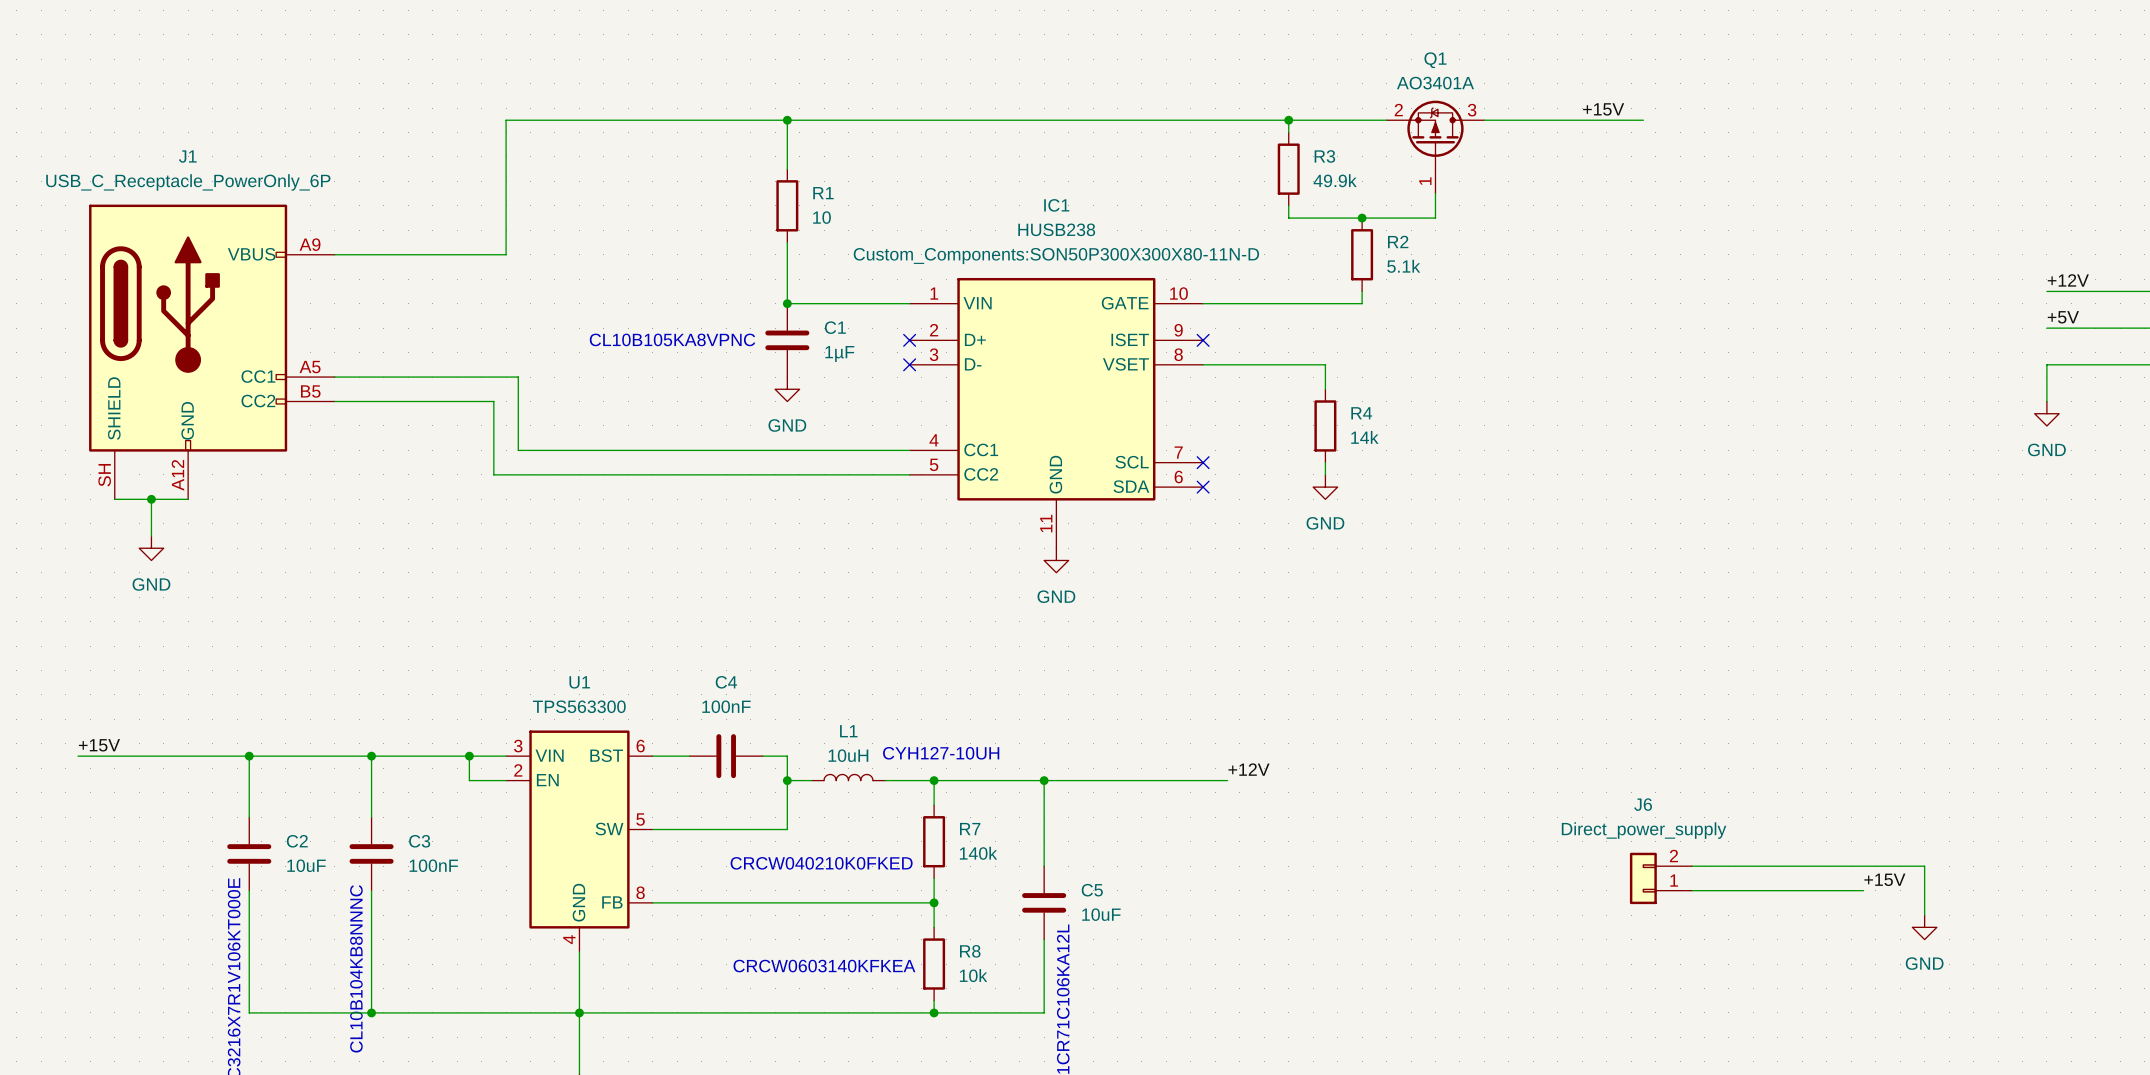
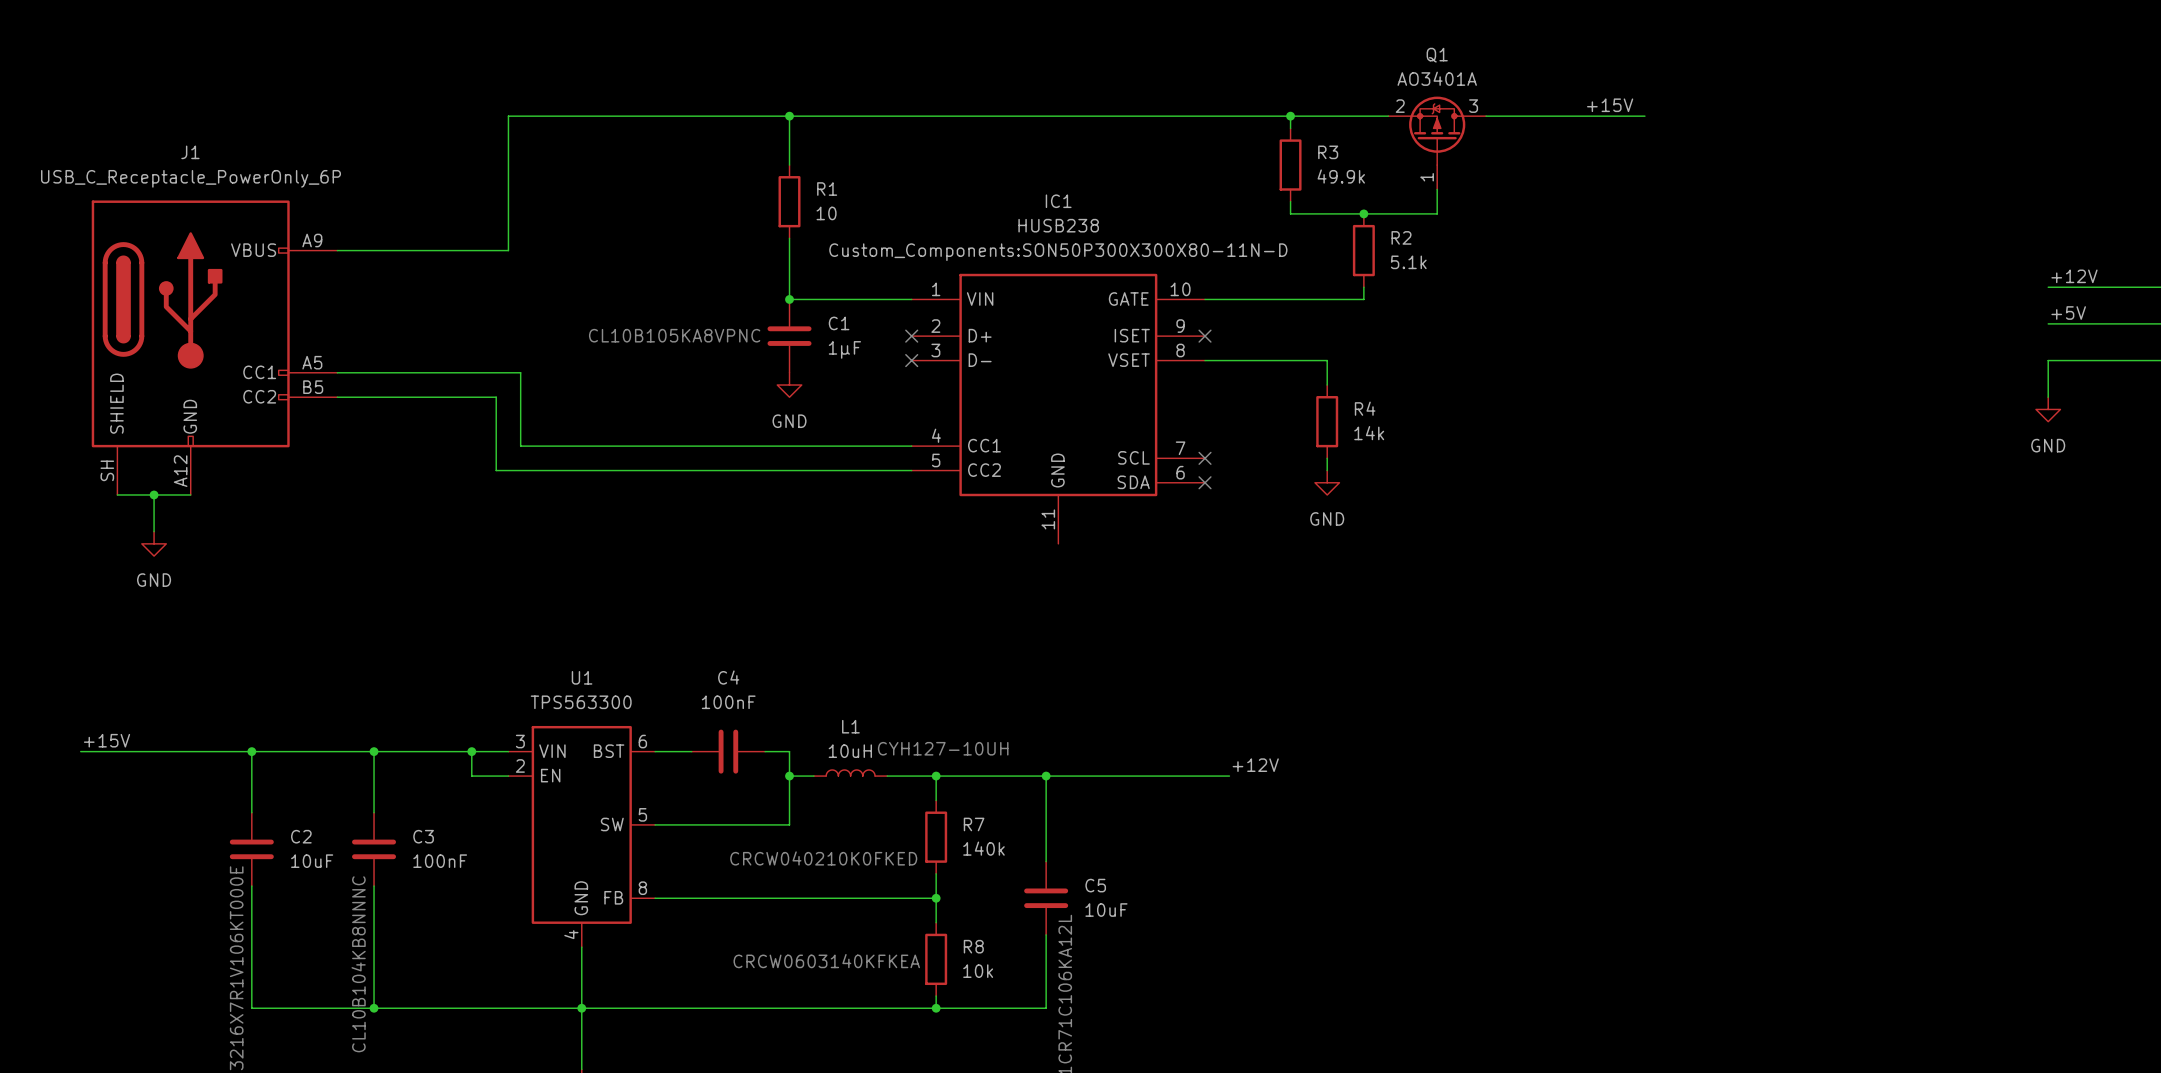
power symbol: GND (1056, 560) -> none
wire: (1692, 866) (1924, 866) (1924, 915) -> none
J6: Direct_power_supply (1661, 878) -> none
label: +15V (1884, 879) -> none
wire: (1692, 890) (1863, 890) -> none
power symbol: GND (1924, 927) -> none

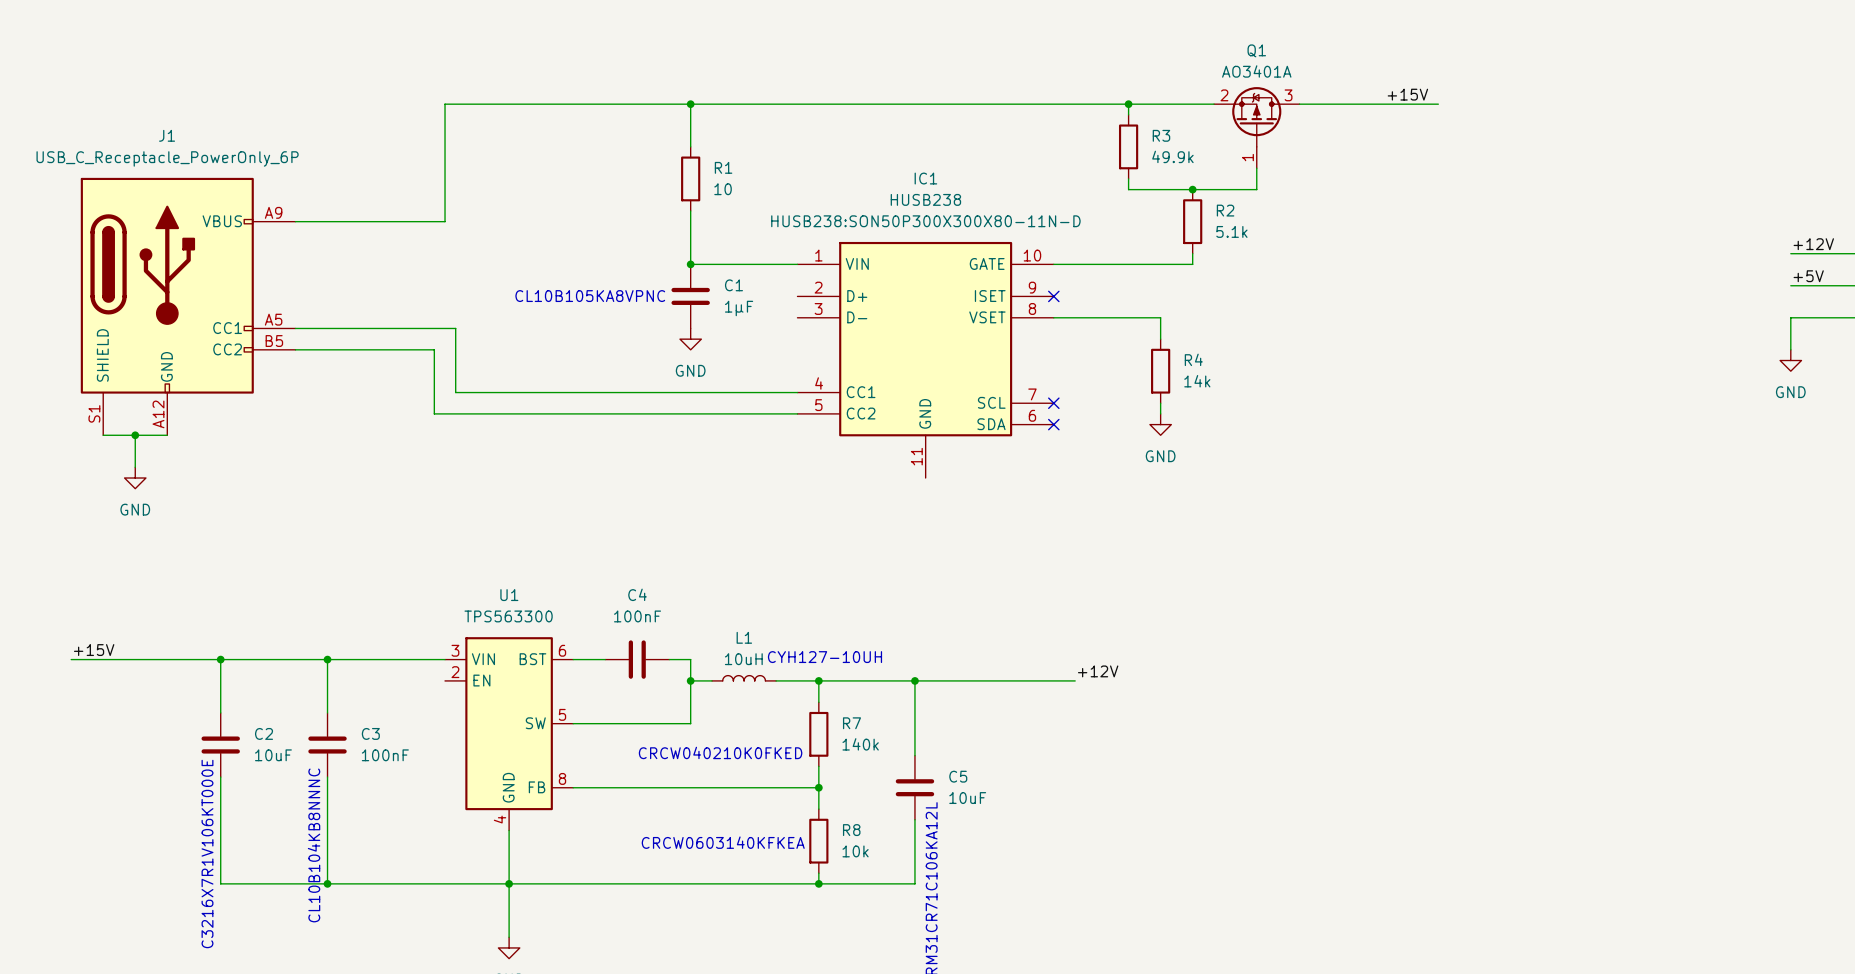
IC1 text: Custom_Components:SON50P300X300X80-11N-D (1058, 252) -> HUSB238:SON50P300X300X80-11N-D (925, 221)
no-connect mark: (911, 336) -> none
no-connect mark: (911, 360) -> none
J1 pin number: SH (107, 470) -> S1 (94, 413)
wire: (471, 751) (471, 776) (508, 776) -> none
junction: (471, 751) -> none

